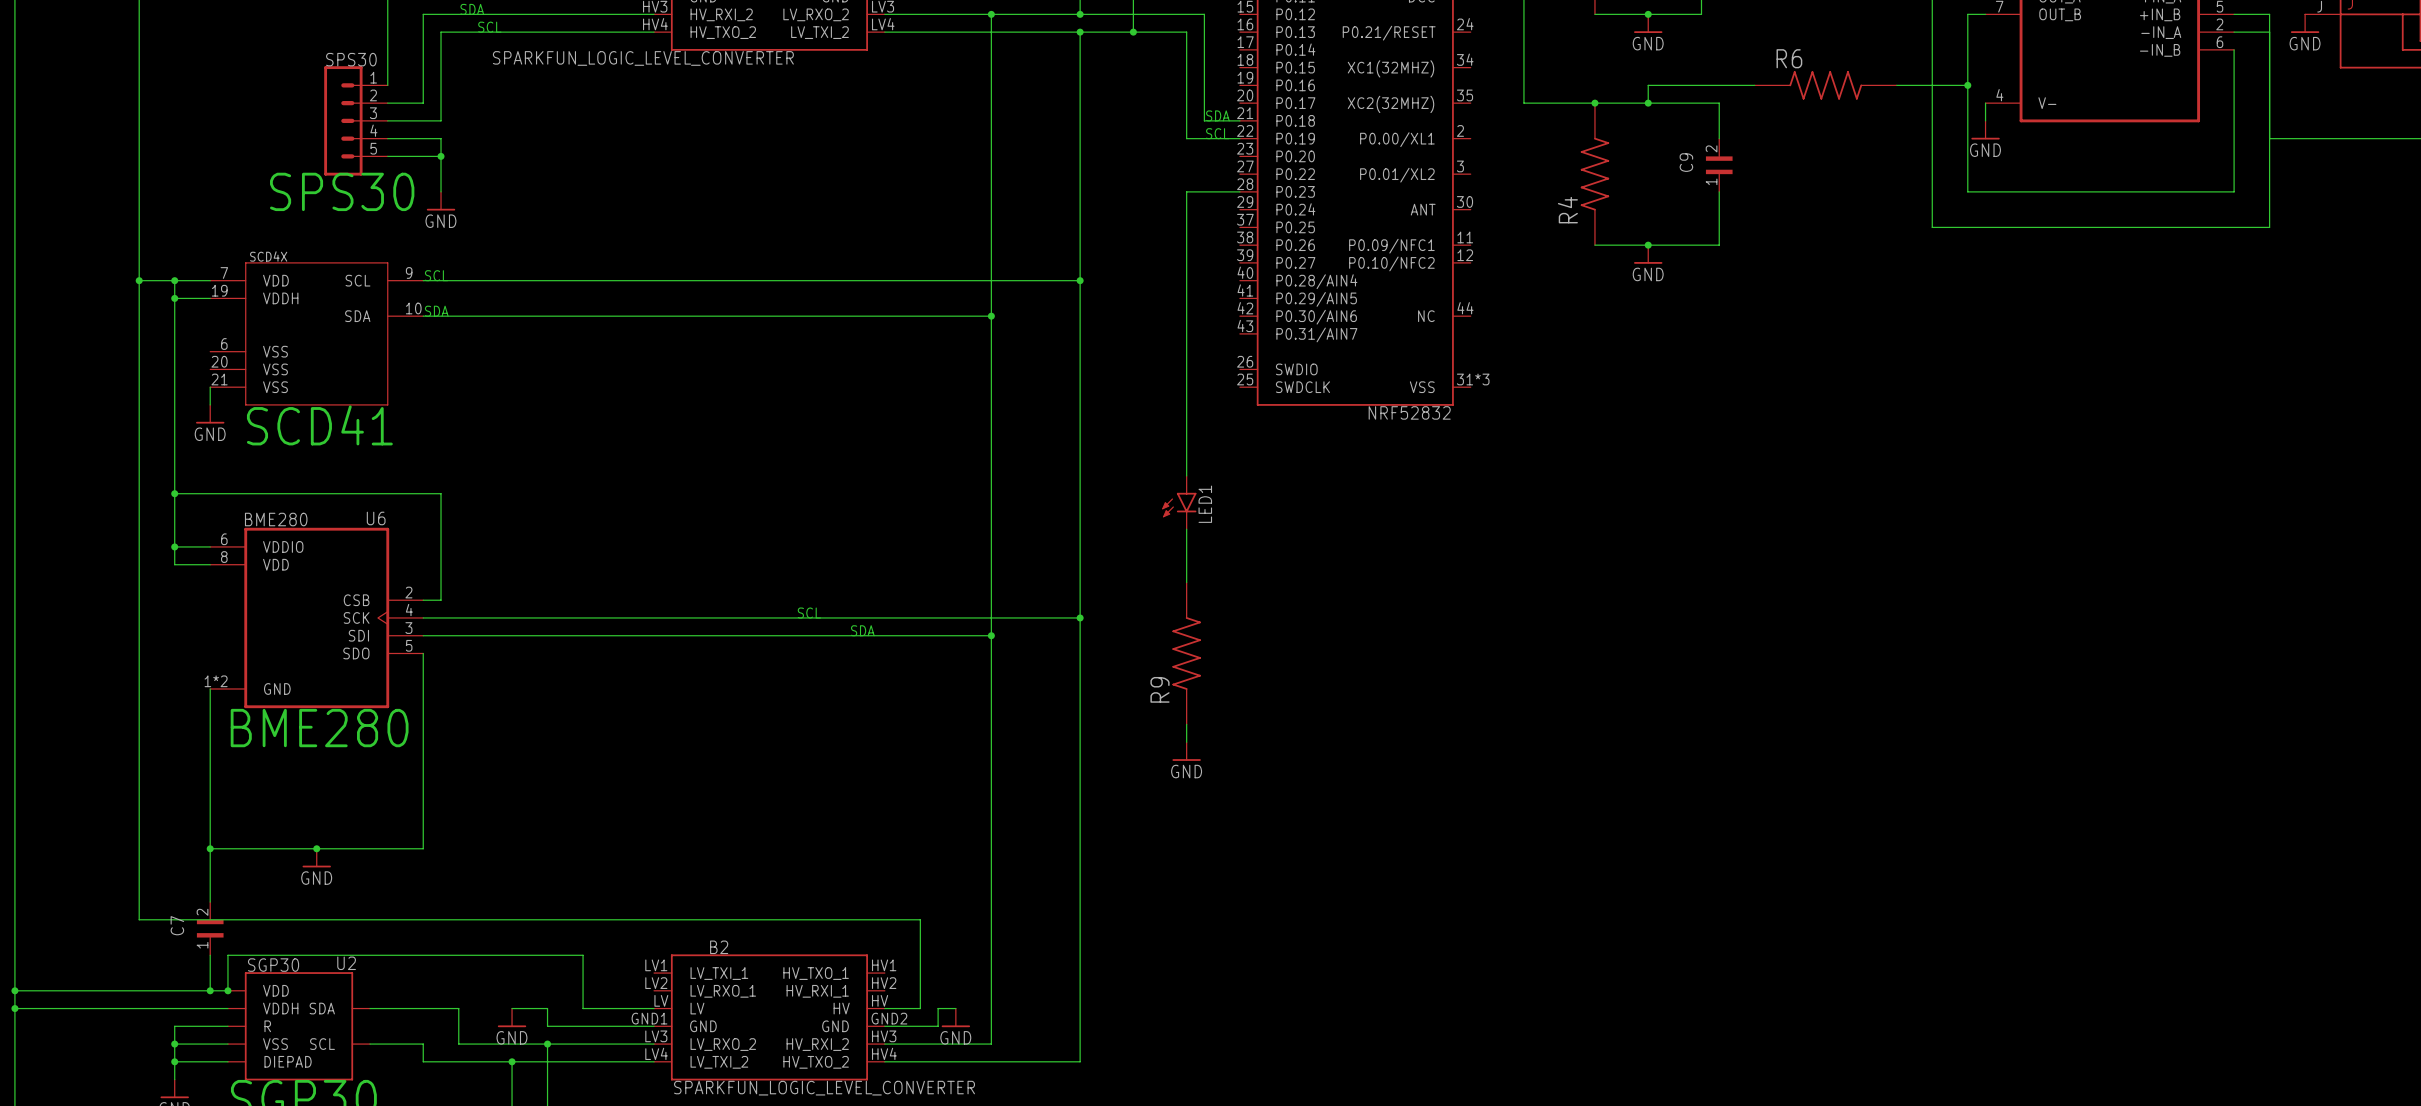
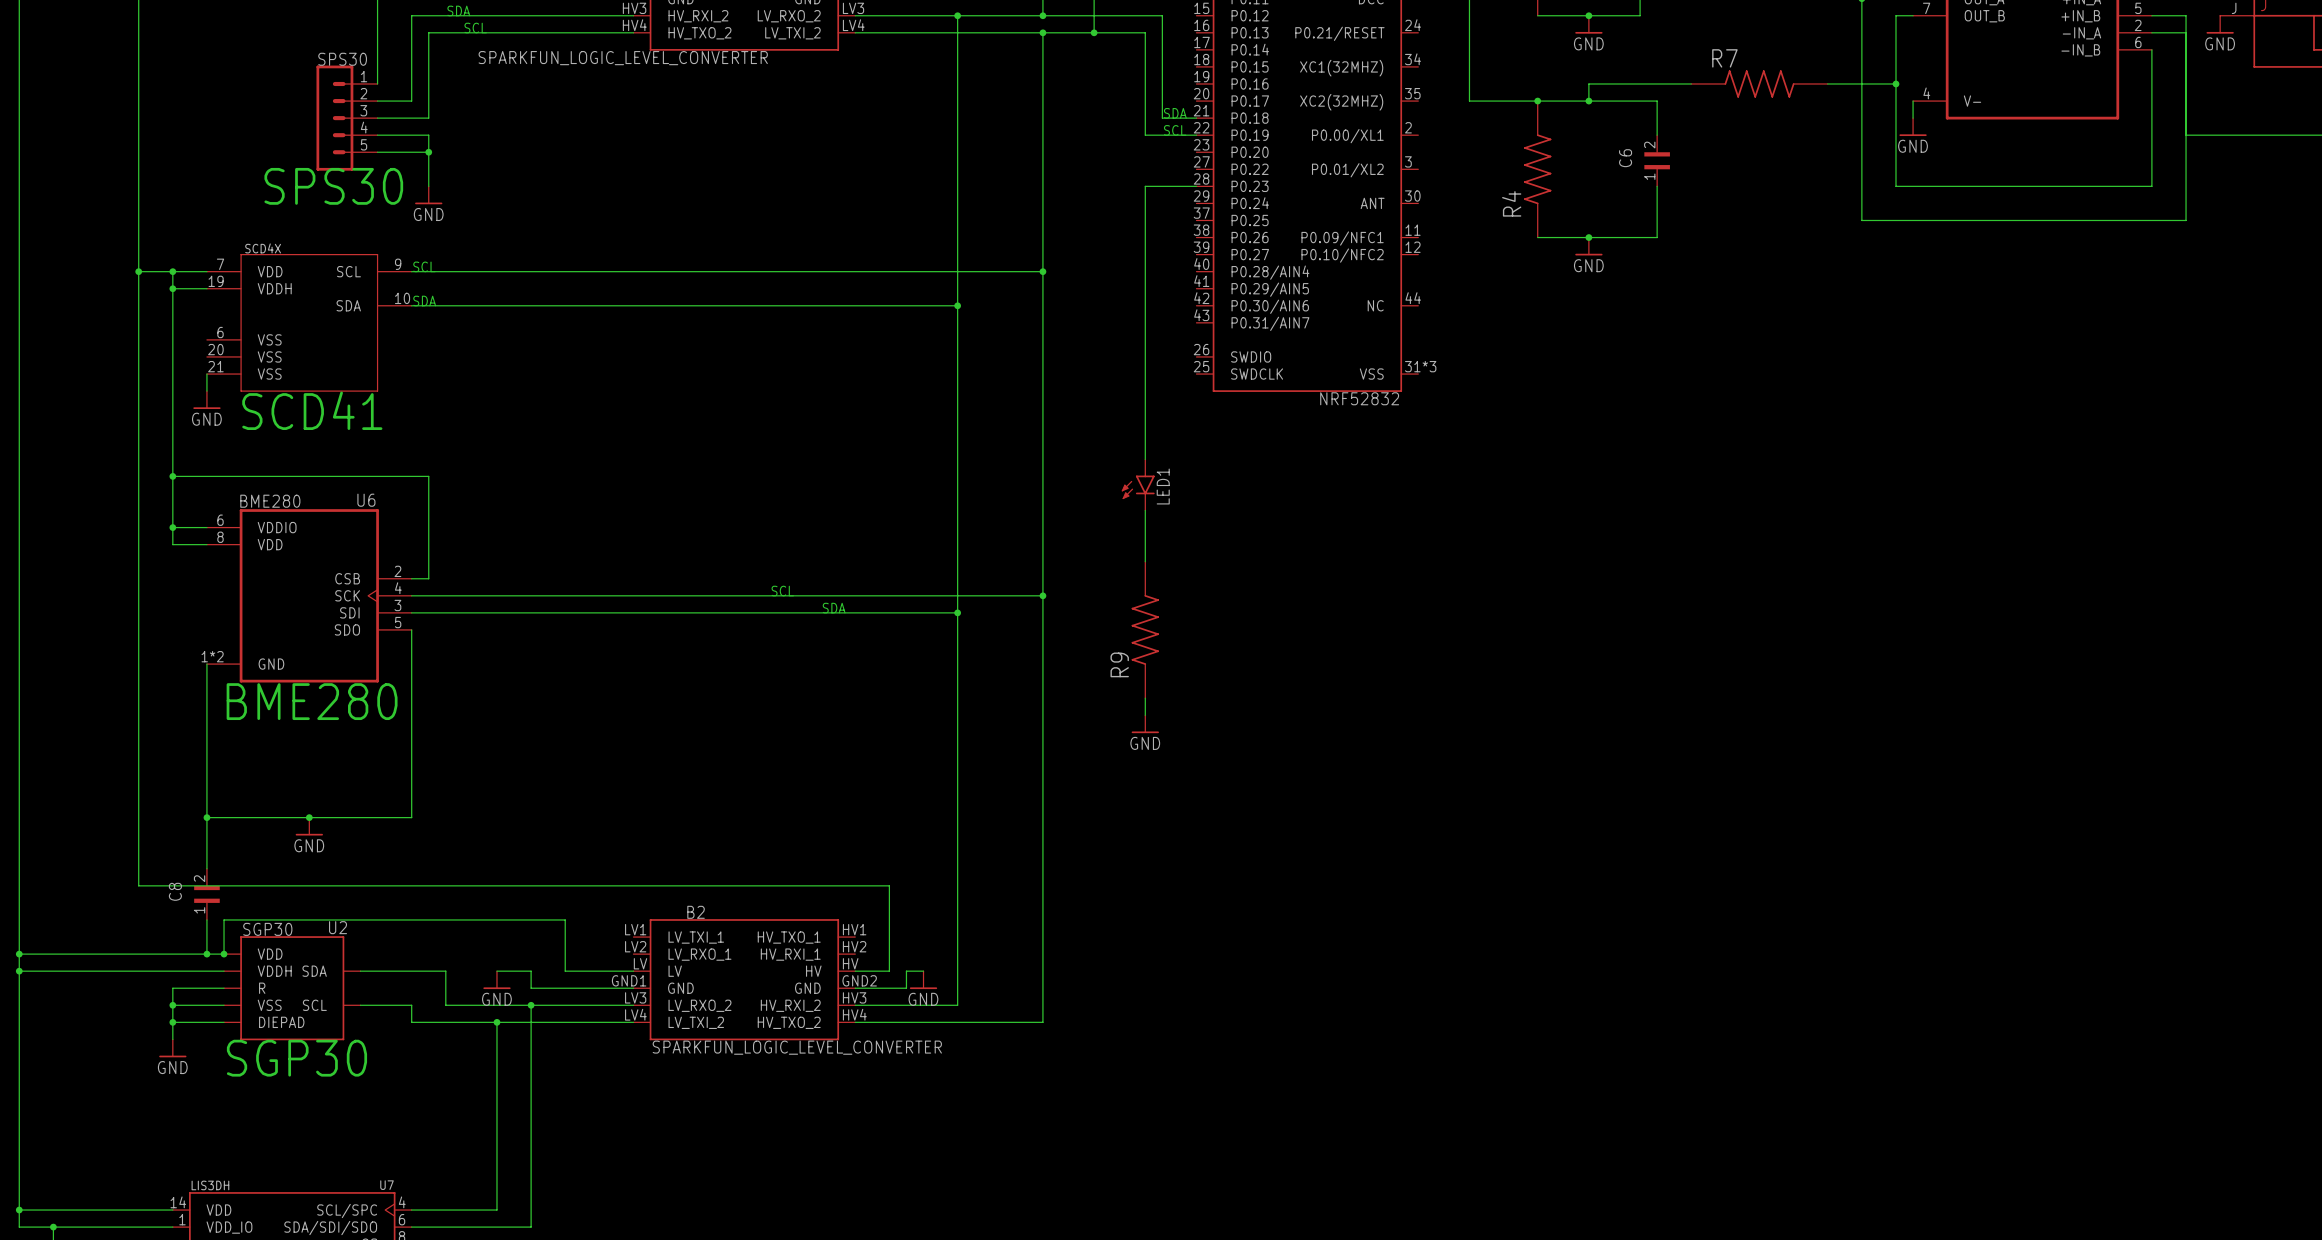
R6 name: R6 (1789, 58) -> R7 (1724, 58)
C9 name: C9 (1686, 162) -> C6 (1625, 158)
C7 name: C7 (177, 925) -> C8 (175, 891)

